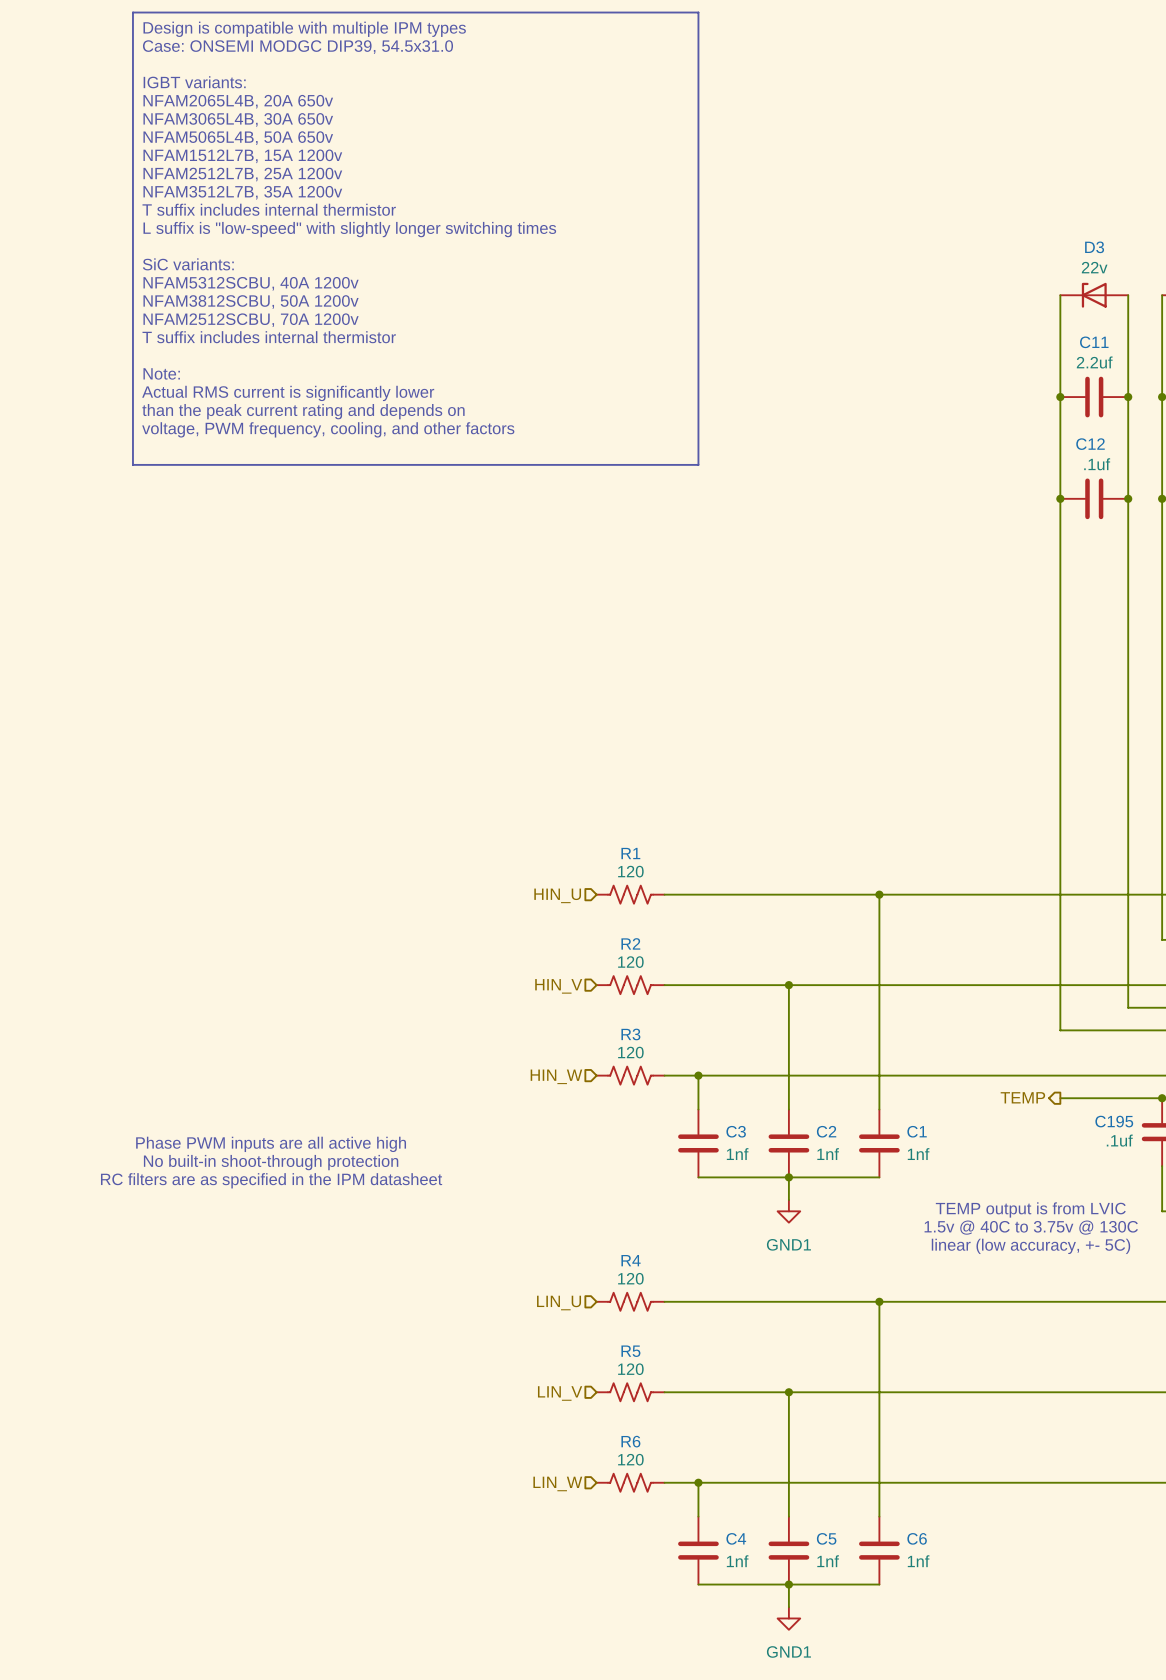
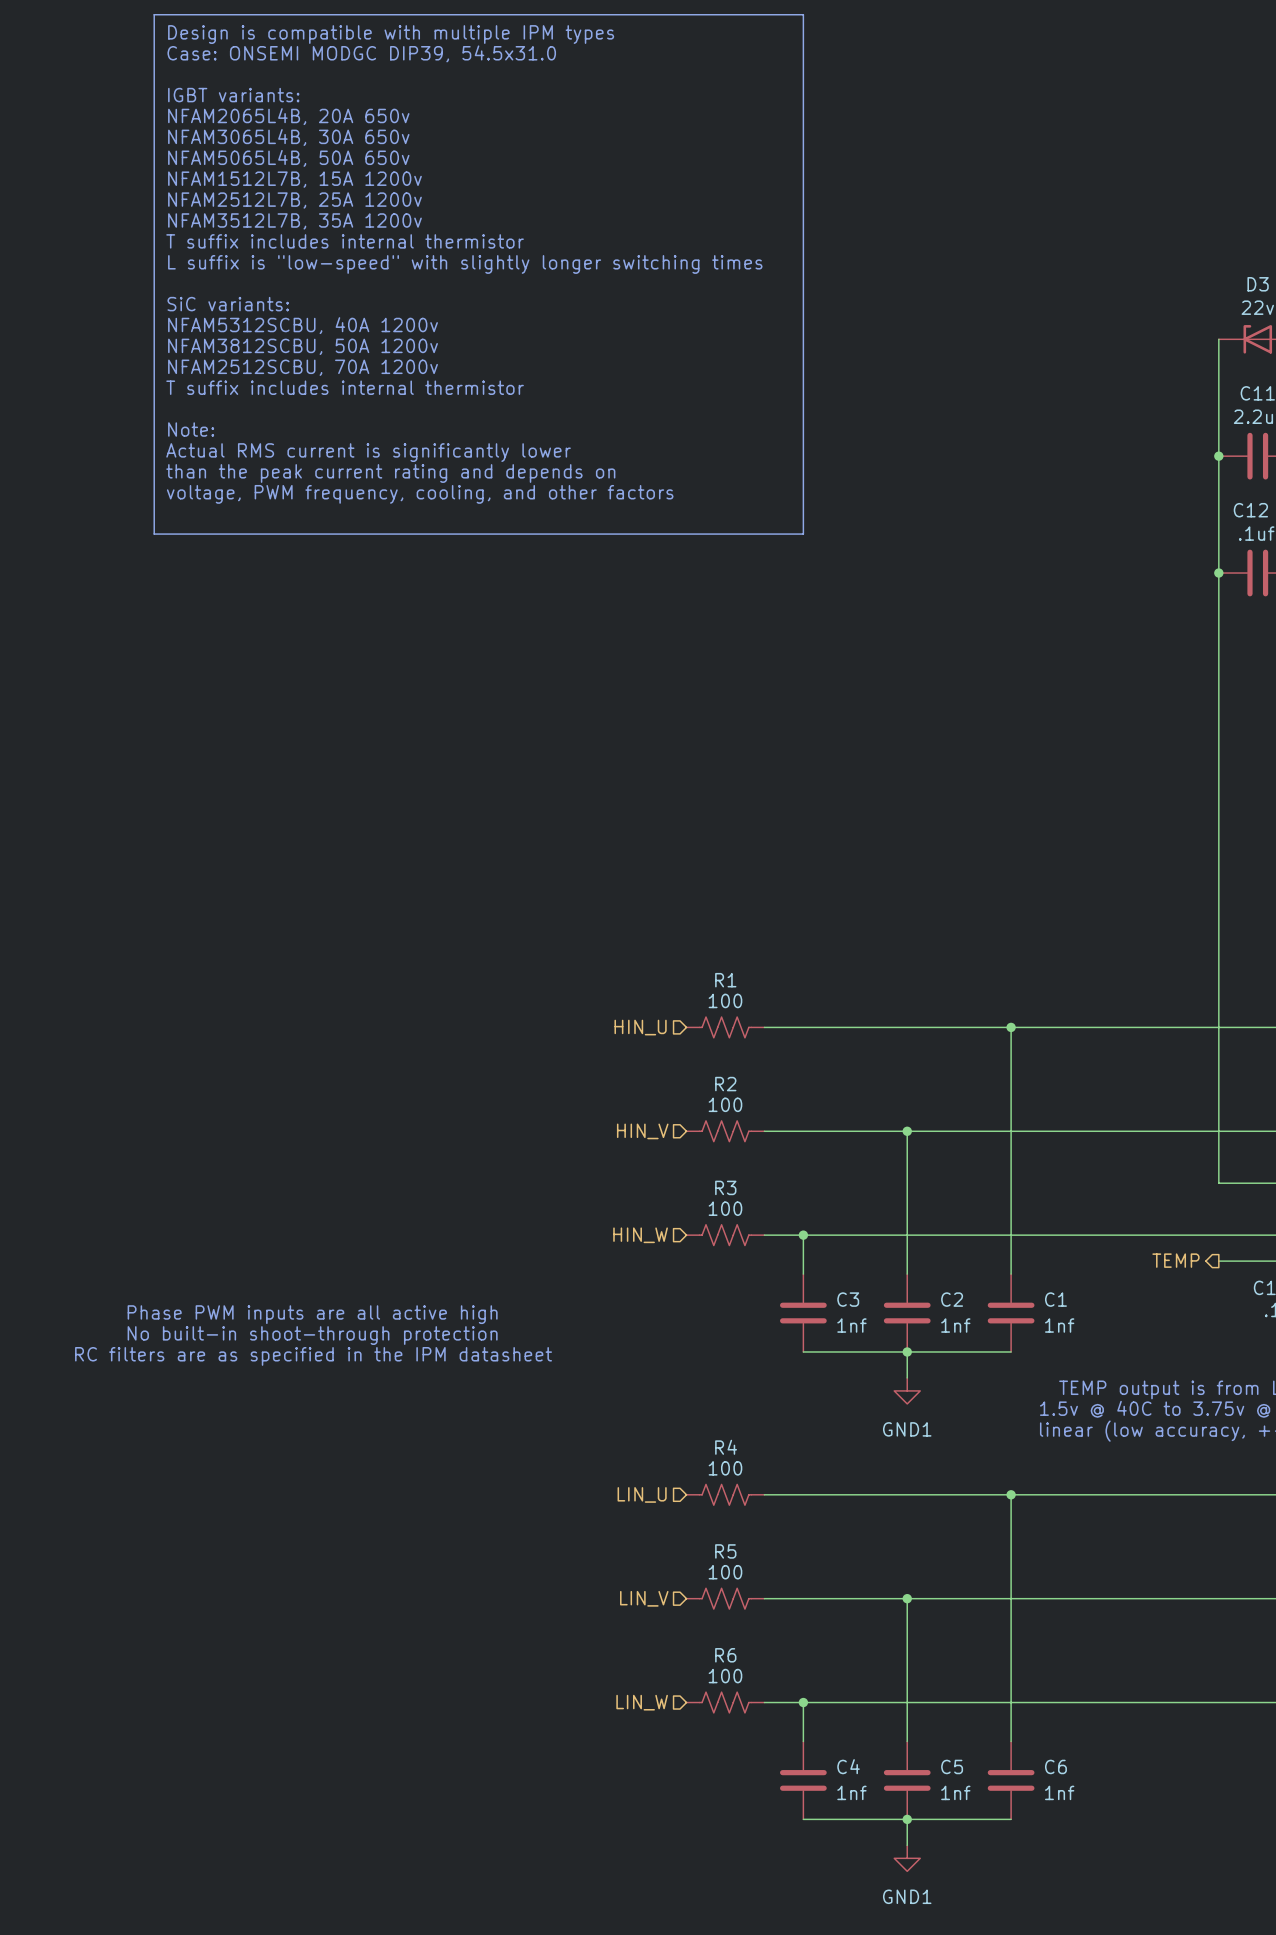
R1 value: 120 (630, 871) -> 100 (725, 1000)
R2 value: 120 (630, 962) -> 100 (725, 1104)
R3 value: 120 (630, 1052) -> 100 (725, 1208)
R4 value: 120 (630, 1278) -> 100 (725, 1468)
R5 value: 120 (630, 1369) -> 100 (725, 1572)
R6 value: 120 (630, 1459) -> 100 (725, 1676)

